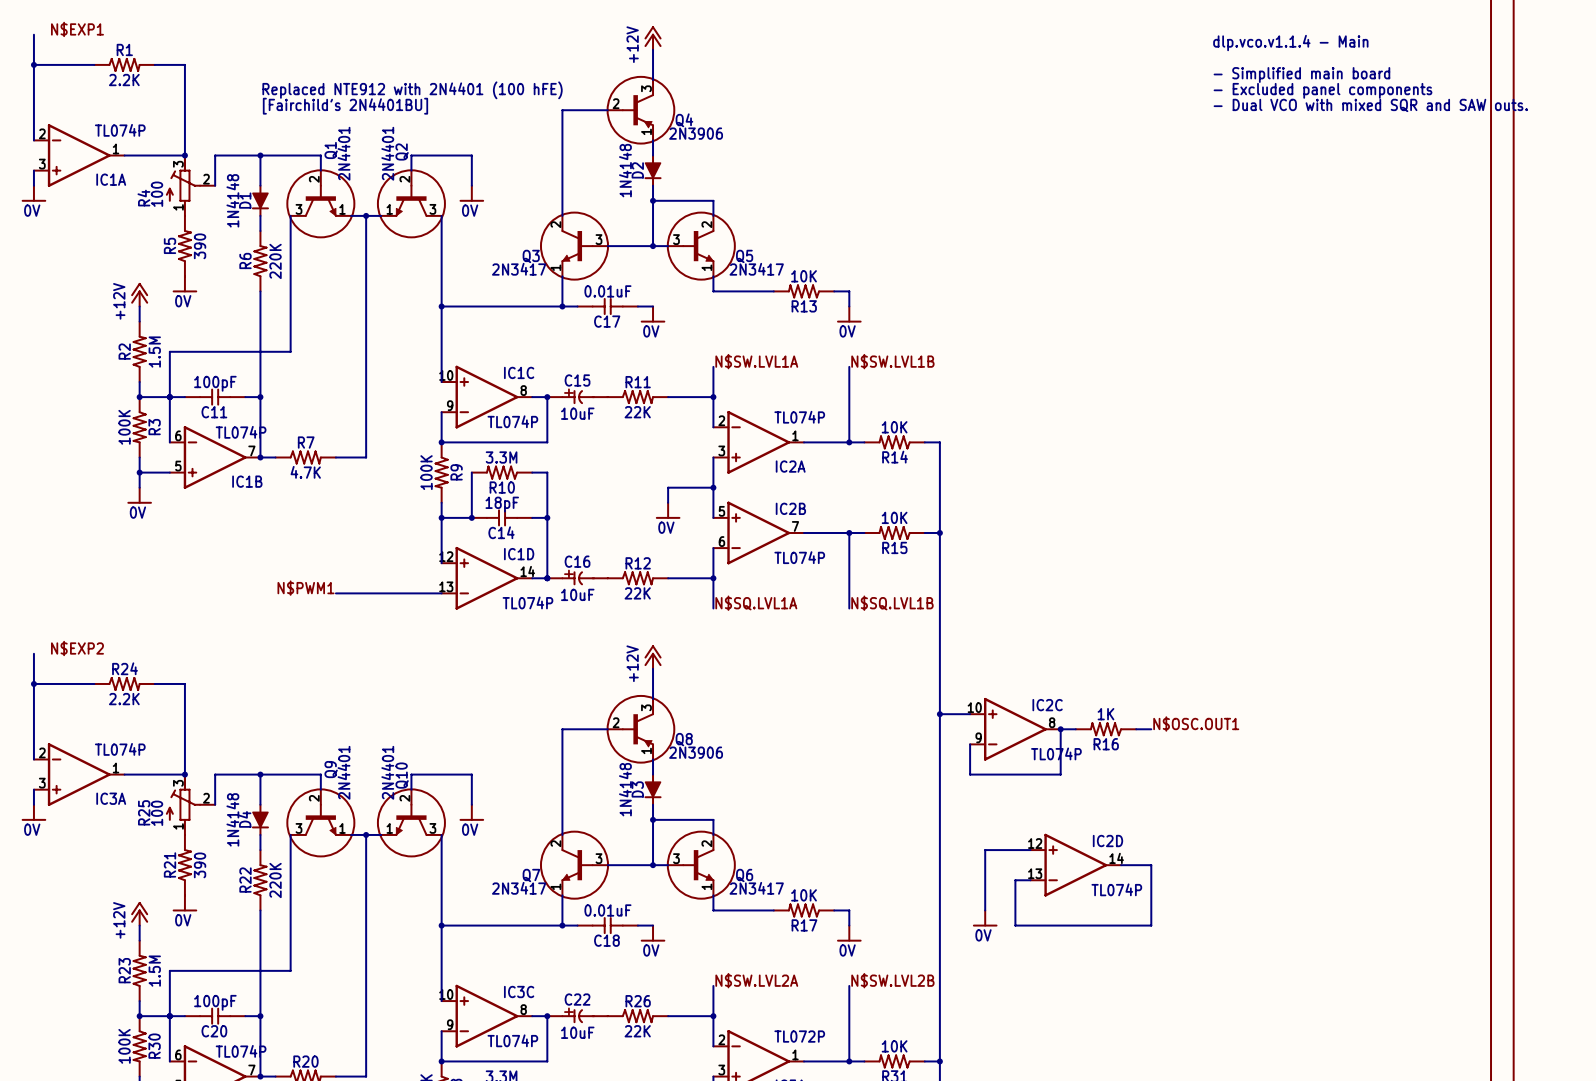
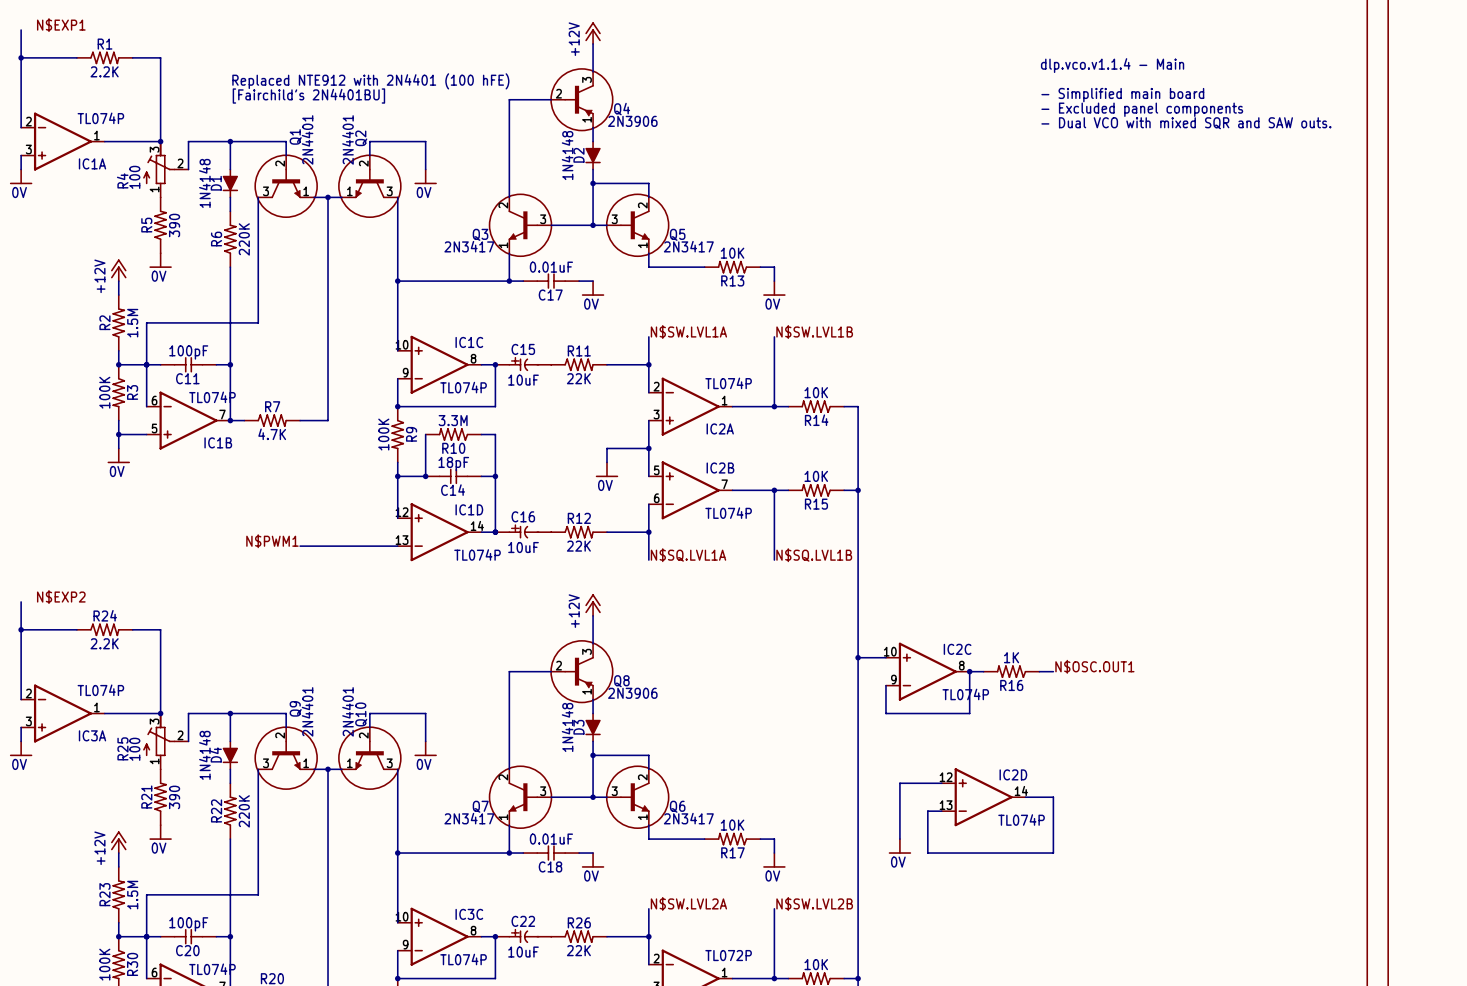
text position: dlp.vco.v1.1.4 - Main (1290, 43) -> dlp.vco.v1.1.4 - Main (1112, 65)
text position: - Simplified main board (1301, 74) -> - Simplified main board (1122, 95)
text position: - Excluded panel components (1322, 90) -> - Excluded panel components (1142, 109)
text position: - Dual VCO with mixed SQR and SAW outs. (1370, 105) -> - Dual VCO with mixed SQR and SAW outs. (1186, 123)

